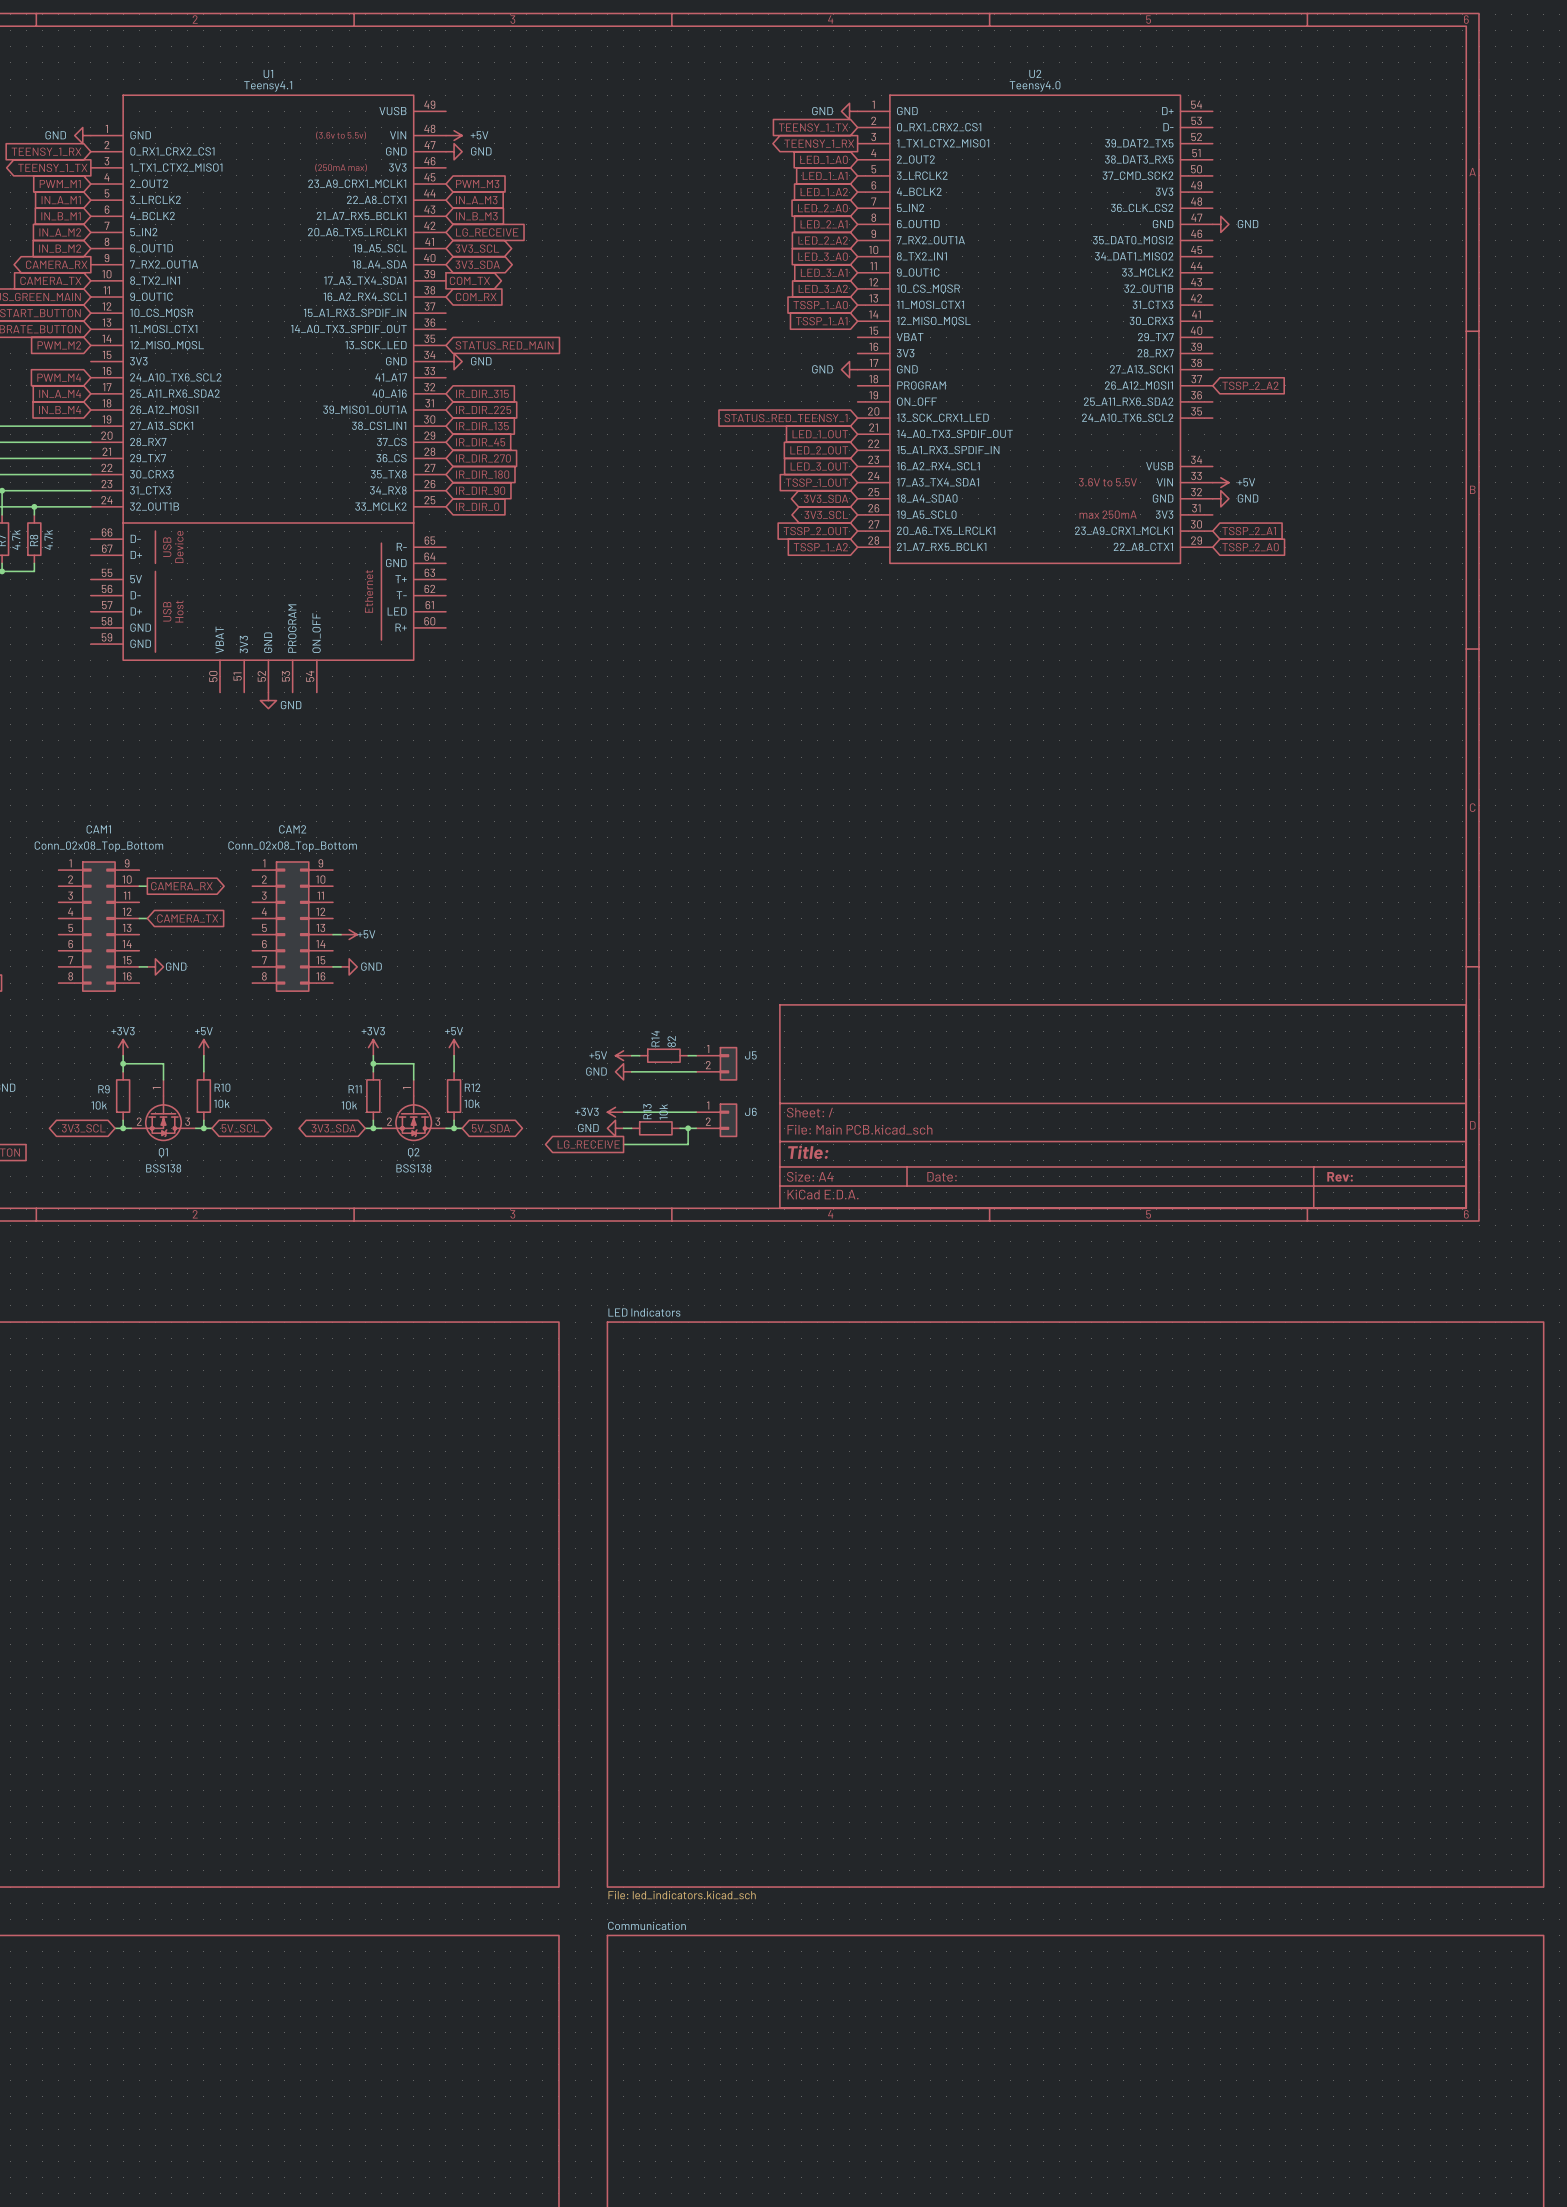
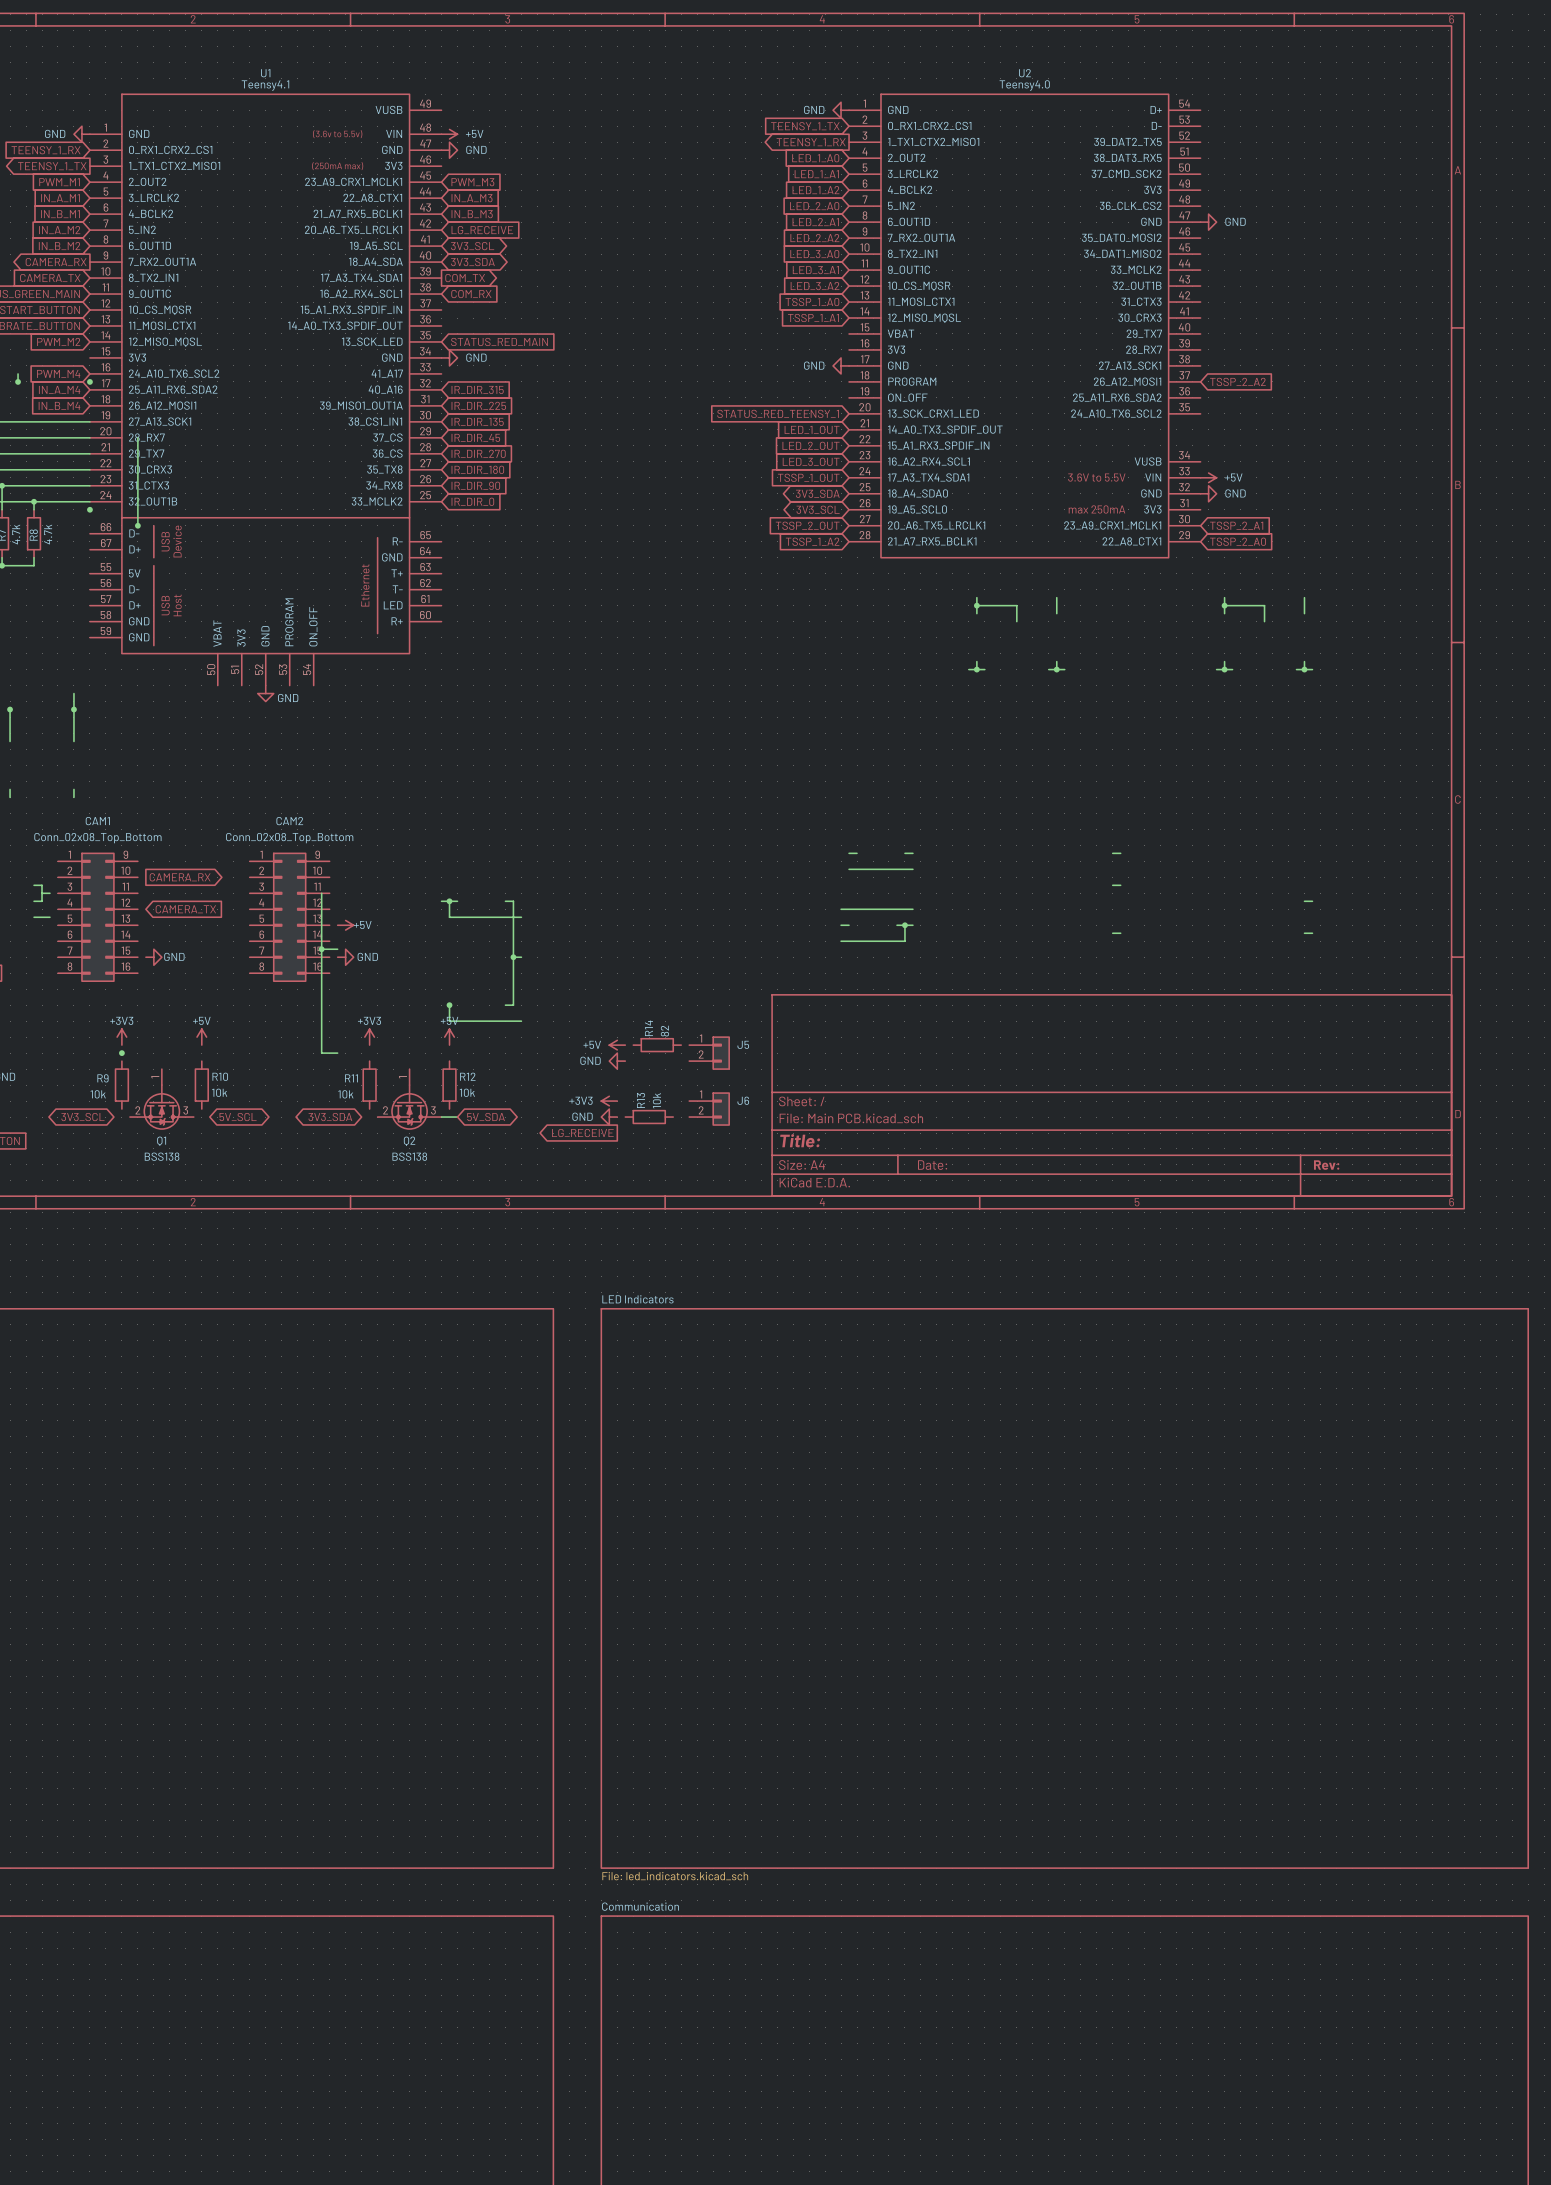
wire: none -> (18, 373) (18, 381)
junction: none -> (18, 381)
junction: none -> (89, 381)
wire: none -> (137, 437) (137, 525)
junction: none -> (89, 509)
junction: none -> (137, 525)
wire: none -> (976, 597) (976, 613)
wire: none -> (1056, 597) (1056, 613)
wire: none -> (1224, 597) (1224, 613)
wire: none -> (1304, 597) (1304, 613)
wire: none -> (976, 605) (1016, 605) (1016, 621)
junction: none -> (976, 605)
wire: none -> (1224, 605) (1264, 605) (1264, 621)
junction: none -> (1224, 605)
wire: none -> (976, 661) (976, 669)
wire: none -> (1056, 661) (1056, 669)
wire: none -> (1224, 661) (1224, 669)
wire: none -> (1304, 661) (1304, 669)
wire: none -> (968, 669) (984, 669)
junction: none -> (976, 669)
wire: none -> (1048, 669) (1064, 669)
junction: none -> (1056, 669)
wire: none -> (1216, 669) (1232, 669)
junction: none -> (1224, 669)
wire: none -> (1296, 669) (1312, 669)
junction: none -> (1304, 669)
wire: none -> (73, 693) (73, 741)
wire: none -> (10, 709) (10, 741)
junction: none -> (10, 709)
junction: none -> (73, 709)
wire: none -> (10, 789) (10, 797)
wire: none -> (73, 789) (73, 797)
wire: none -> (849, 853) (857, 853)
wire: none -> (904, 853) (912, 853)
wire: none -> (1112, 853) (1120, 853)
wire: none -> (849, 869) (912, 869)
wire: (139, 886) (147, 886) -> none
wire: none -> (34, 885) (42, 885) (42, 901) (34, 901)
wire: none -> (1112, 885) (1120, 885)
wire: none -> (321, 893) (321, 1053) (337, 1053)
wire: none -> (441, 901) (457, 901)
wire: none -> (449, 901) (449, 917) (521, 917)
junction: none -> (449, 901)
wire: none -> (505, 901) (513, 901) (513, 1005) (505, 1005)
wire: none -> (1304, 901) (1312, 901)
wire: (139, 918) (147, 918) -> (42, 893) (49, 893)
wire: none -> (841, 909) (912, 909)
wire: none -> (34, 917) (49, 917)
wire: (332, 934) (341, 934) -> none
wire: none -> (841, 925) (849, 925)
wire: none -> (896, 925) (912, 925)
wire: none -> (904, 925) (904, 941) (841, 941)
junction: none -> (904, 925)
wire: none -> (1112, 933) (1120, 933)
wire: none -> (1304, 933) (1312, 933)
wire: none -> (321, 949) (337, 949)
junction: none -> (321, 949)
wire: (139, 966) (147, 966) -> none
wire: (332, 966) (341, 966) -> none
junction: none -> (513, 957)
wire: none -> (449, 1005) (449, 1021) (521, 1021)
junction: none -> (449, 1005)
wire: (123, 1055) (123, 1071) -> none
wire: (203, 1055) (203, 1071) -> none
wire: (373, 1055) (373, 1071) -> none
wire: (454, 1055) (454, 1071) -> none
wire: (631, 1055) (639, 1055) -> (513, 957) (521, 957)
wire: (688, 1055) (696, 1055) -> none
wire: (123, 1063) (163, 1063) (163, 1079) -> none
wire: (373, 1063) (413, 1063) (413, 1079) -> none
junction: (373, 1063) -> none
wire: (631, 1071) (696, 1071) -> none
wire: (623, 1112) (696, 1112) -> none
wire: (123, 1120) (123, 1128) -> none
wire: (203, 1120) (203, 1128) -> none
wire: (373, 1120) (373, 1128) -> none
wire: (454, 1120) (454, 1128) -> none
wire: (115, 1128) (131, 1128) -> none
junction: (123, 1128) -> none
wire: (195, 1128) (211, 1128) -> none
junction: (203, 1128) -> none
wire: (365, 1128) (381, 1128) -> none
junction: (373, 1128) -> none
junction: (454, 1128) -> none
wire: (623, 1128) (631, 1128) -> none
wire: (680, 1128) (696, 1128) -> none
wire: (688, 1128) (688, 1144) (623, 1144) -> none
junction: (688, 1128) -> none

